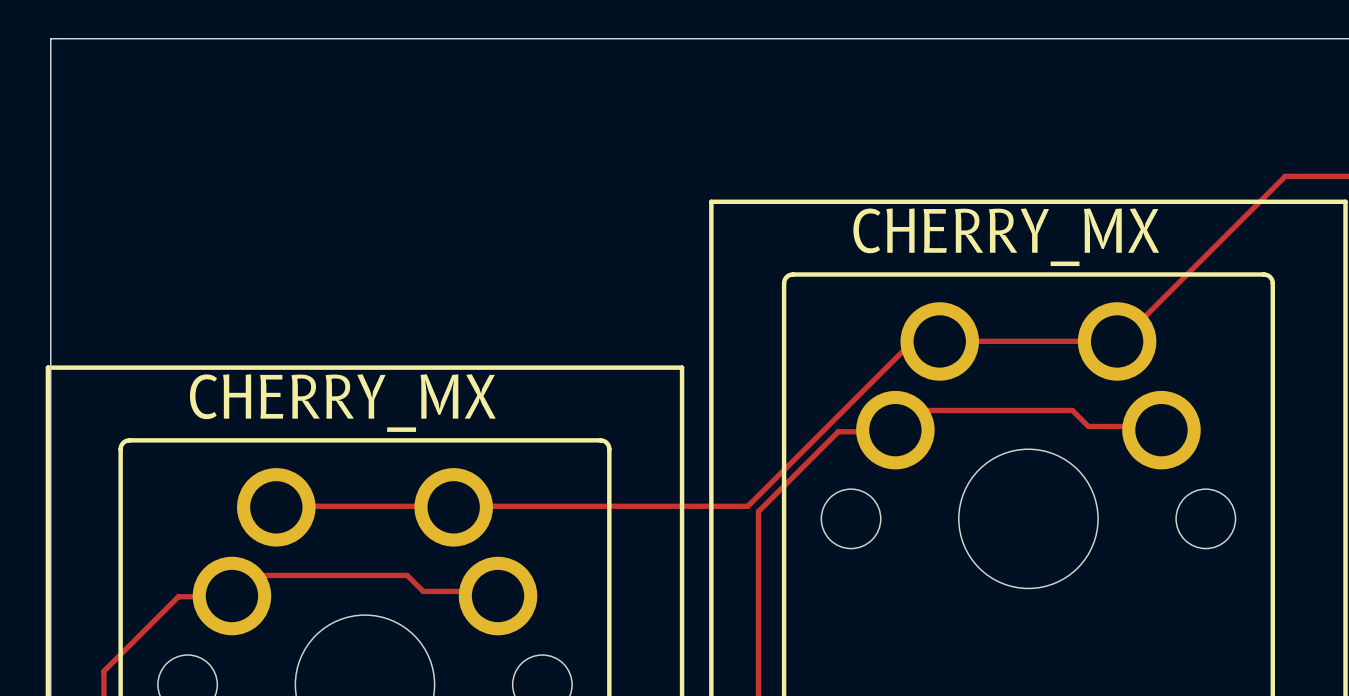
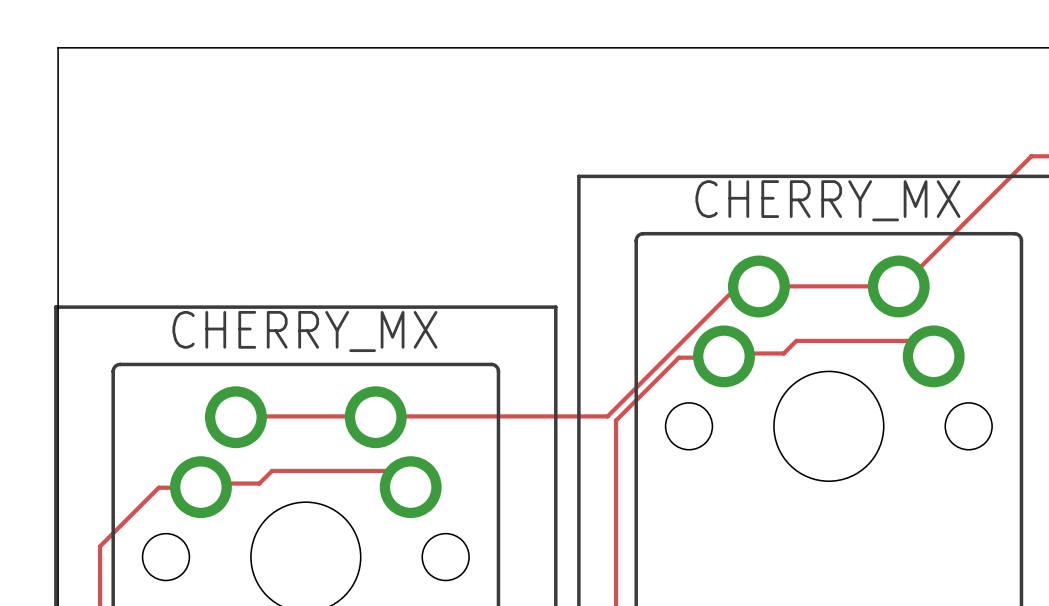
track: (987, 410) (912, 410) (896, 426) -> (796, 340) (783, 353) (725, 353)
track: (1072, 410) (1088, 426) (1157, 426) -> (863, 340) (918, 340) (930, 353)
track: (322, 575) (252, 575) (236, 591) -> (272, 470) (259, 483) (204, 483)
track: (407, 575) (423, 591) (497, 591) -> (339, 470) (397, 470) (410, 483)

